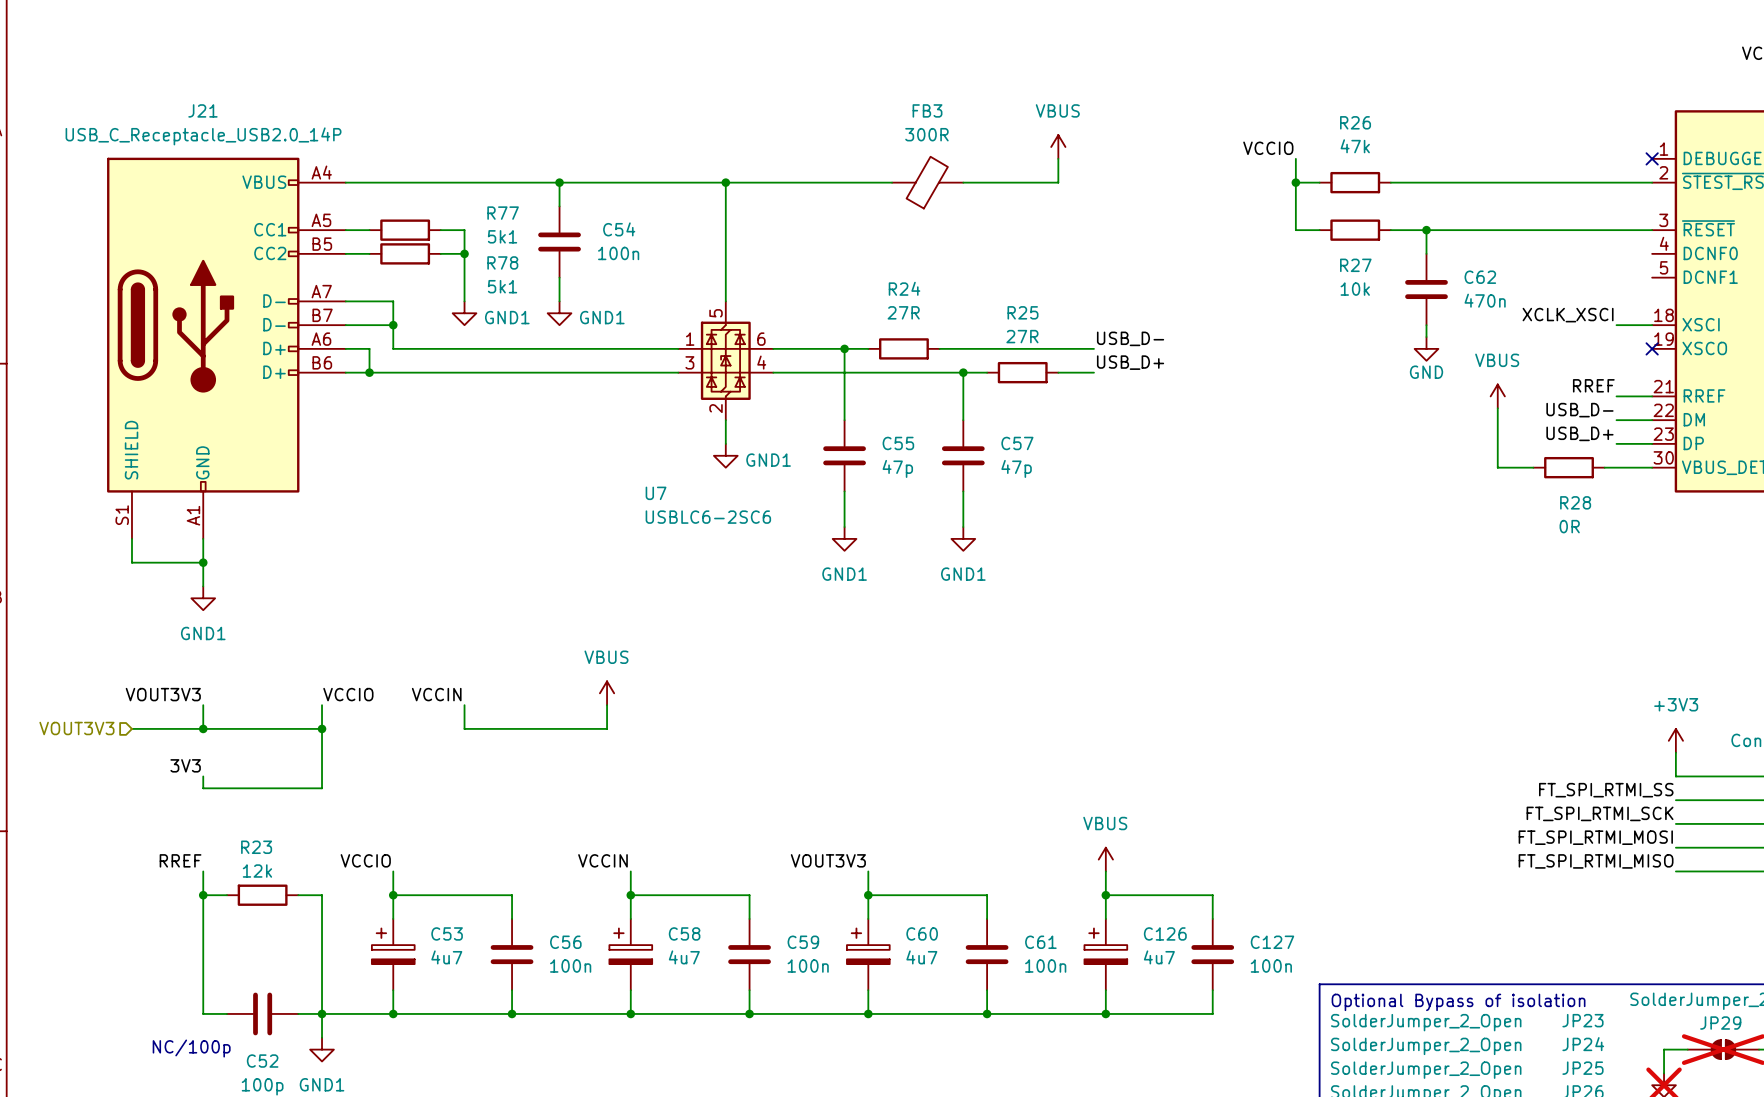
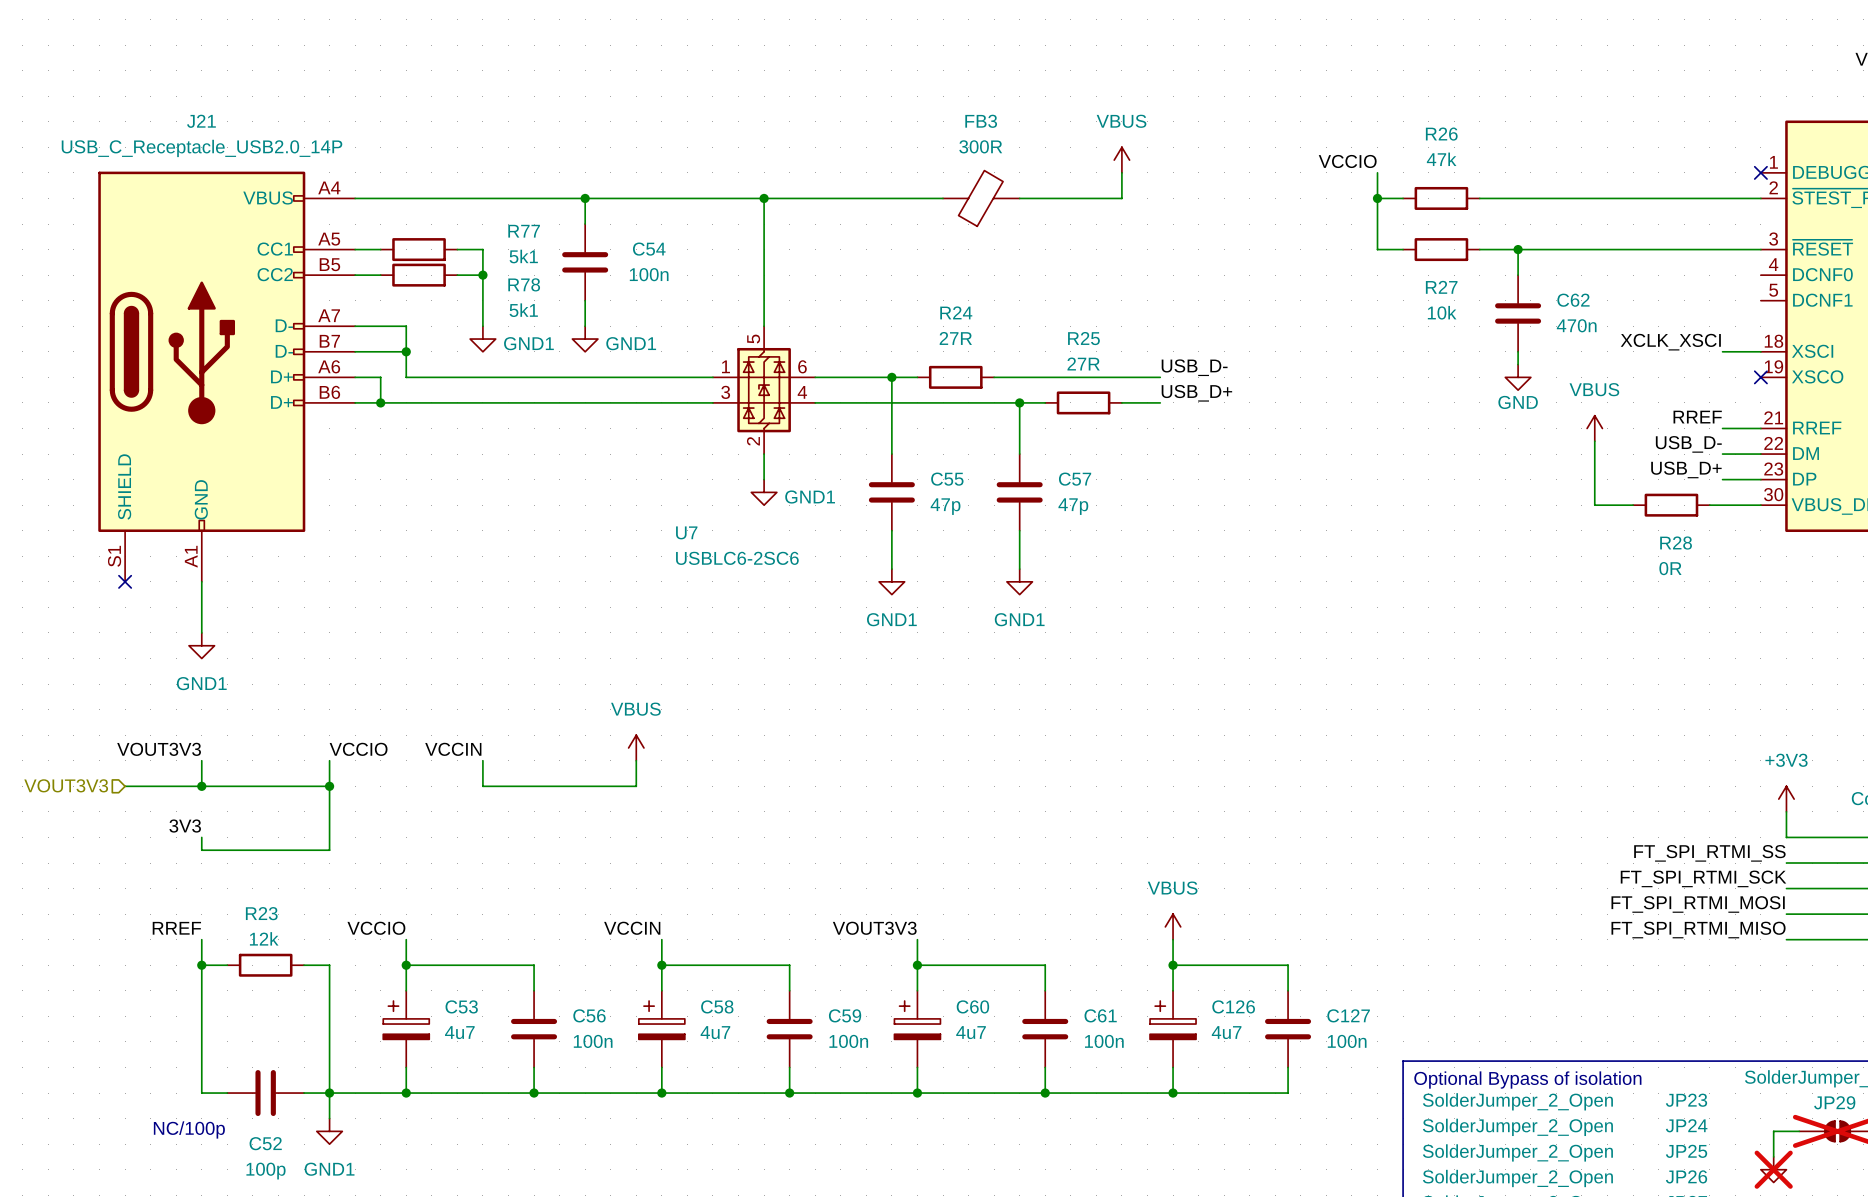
wire: (131, 538) (131, 562) (203, 562) -> none
no-connect mark: none -> (125, 581)
junction: (203, 562) -> none

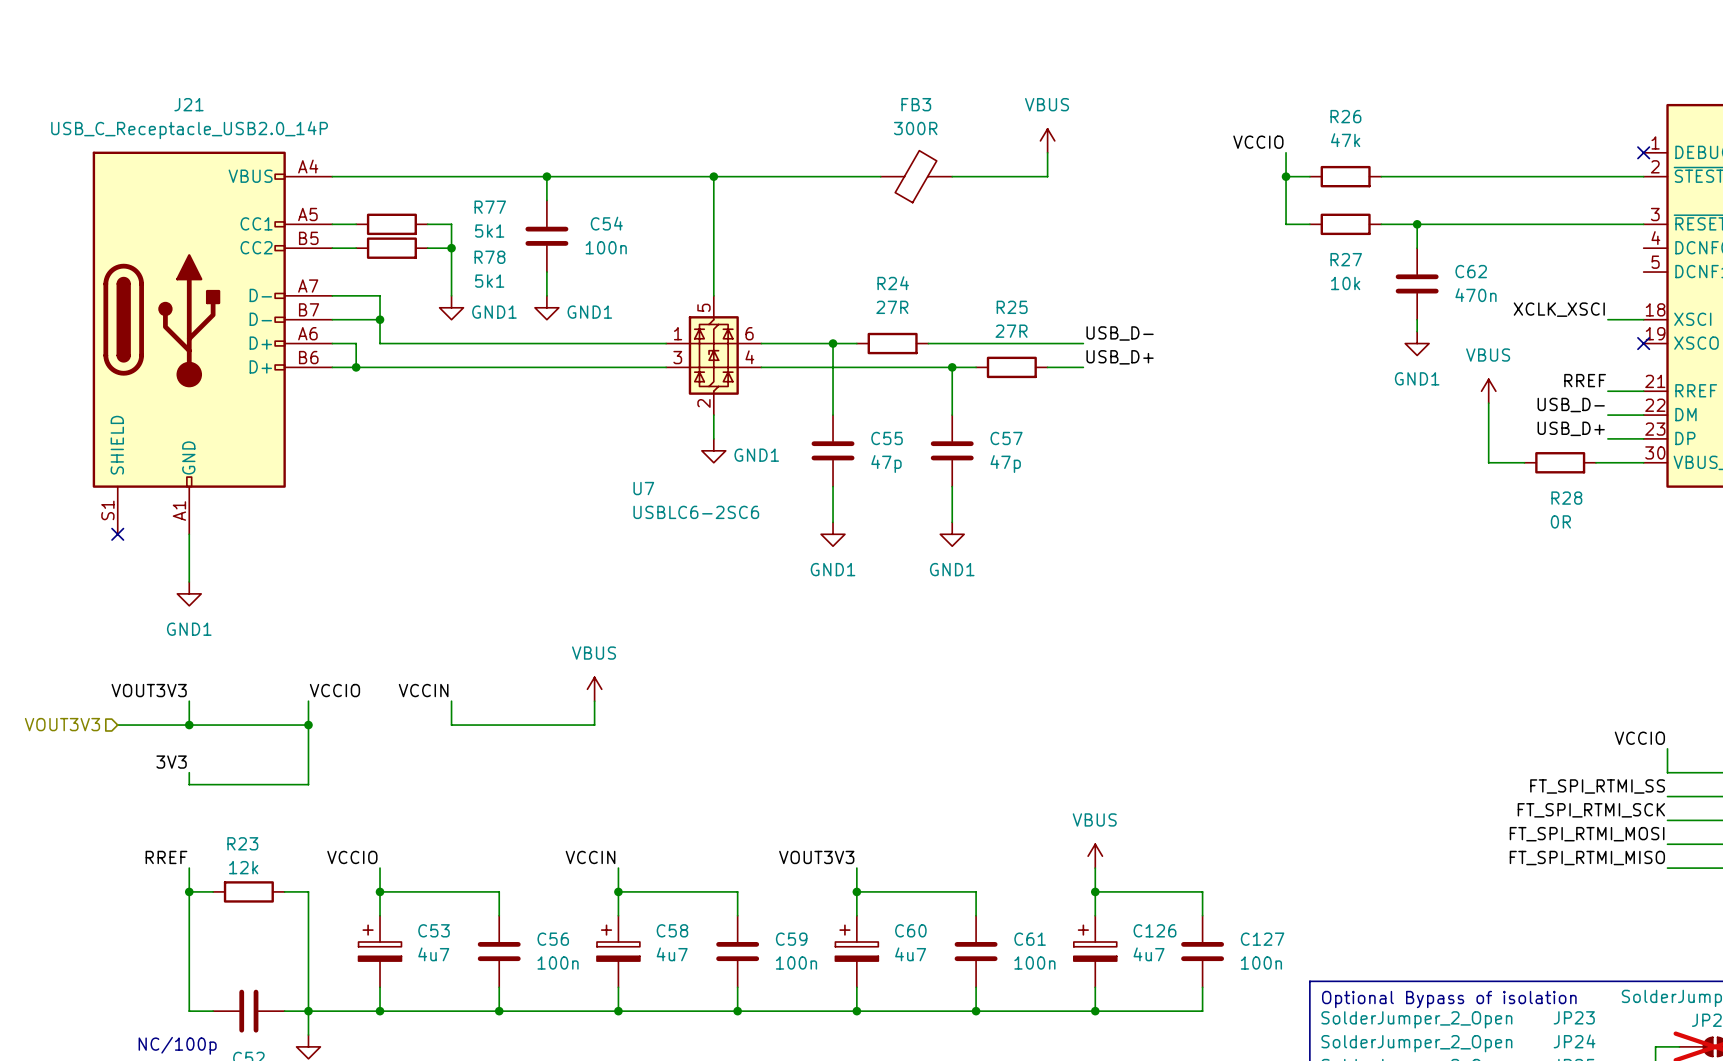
power symbol: GND (1518, 377) -> GND1 (1417, 343)
power symbol: +3V3 (1786, 799) -> none
label: none -> VCCIO (1639, 738)

